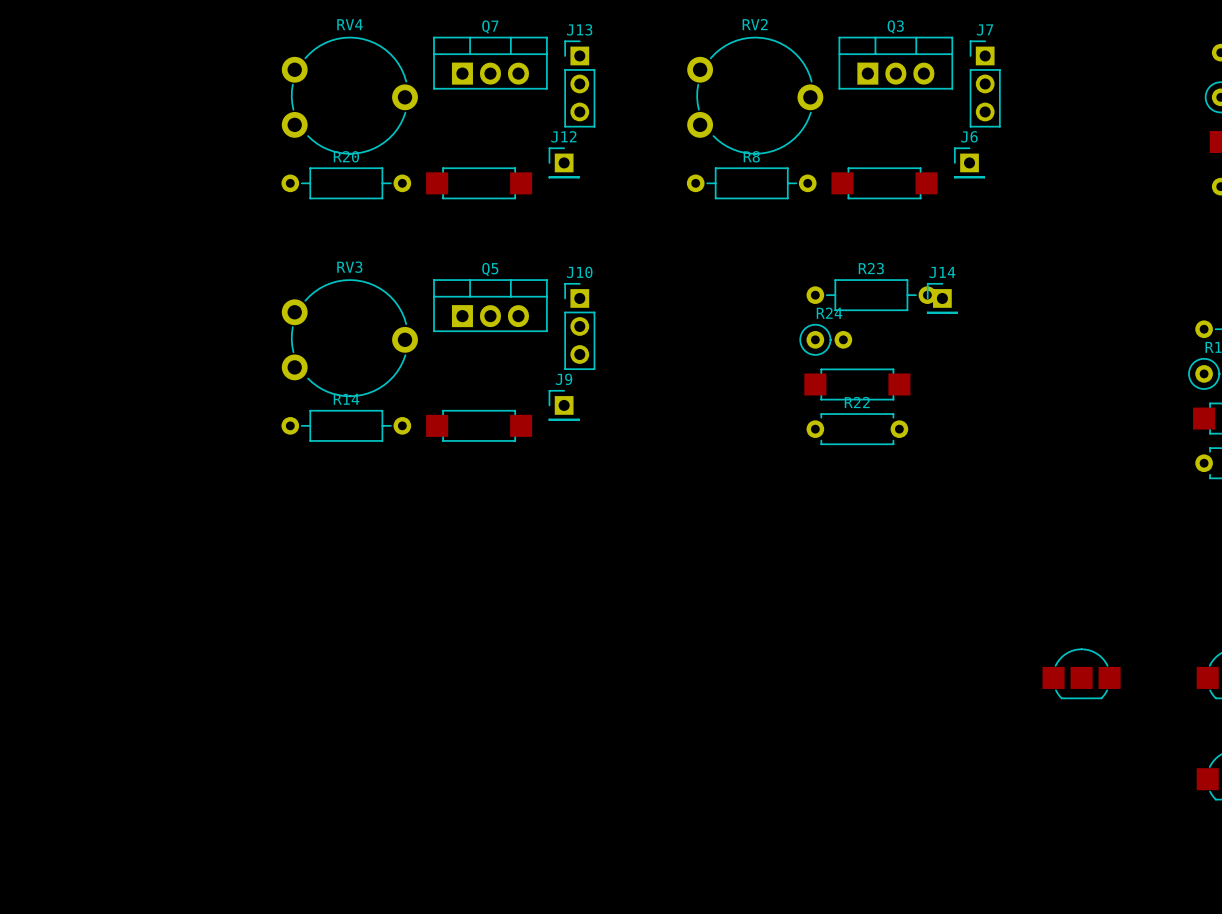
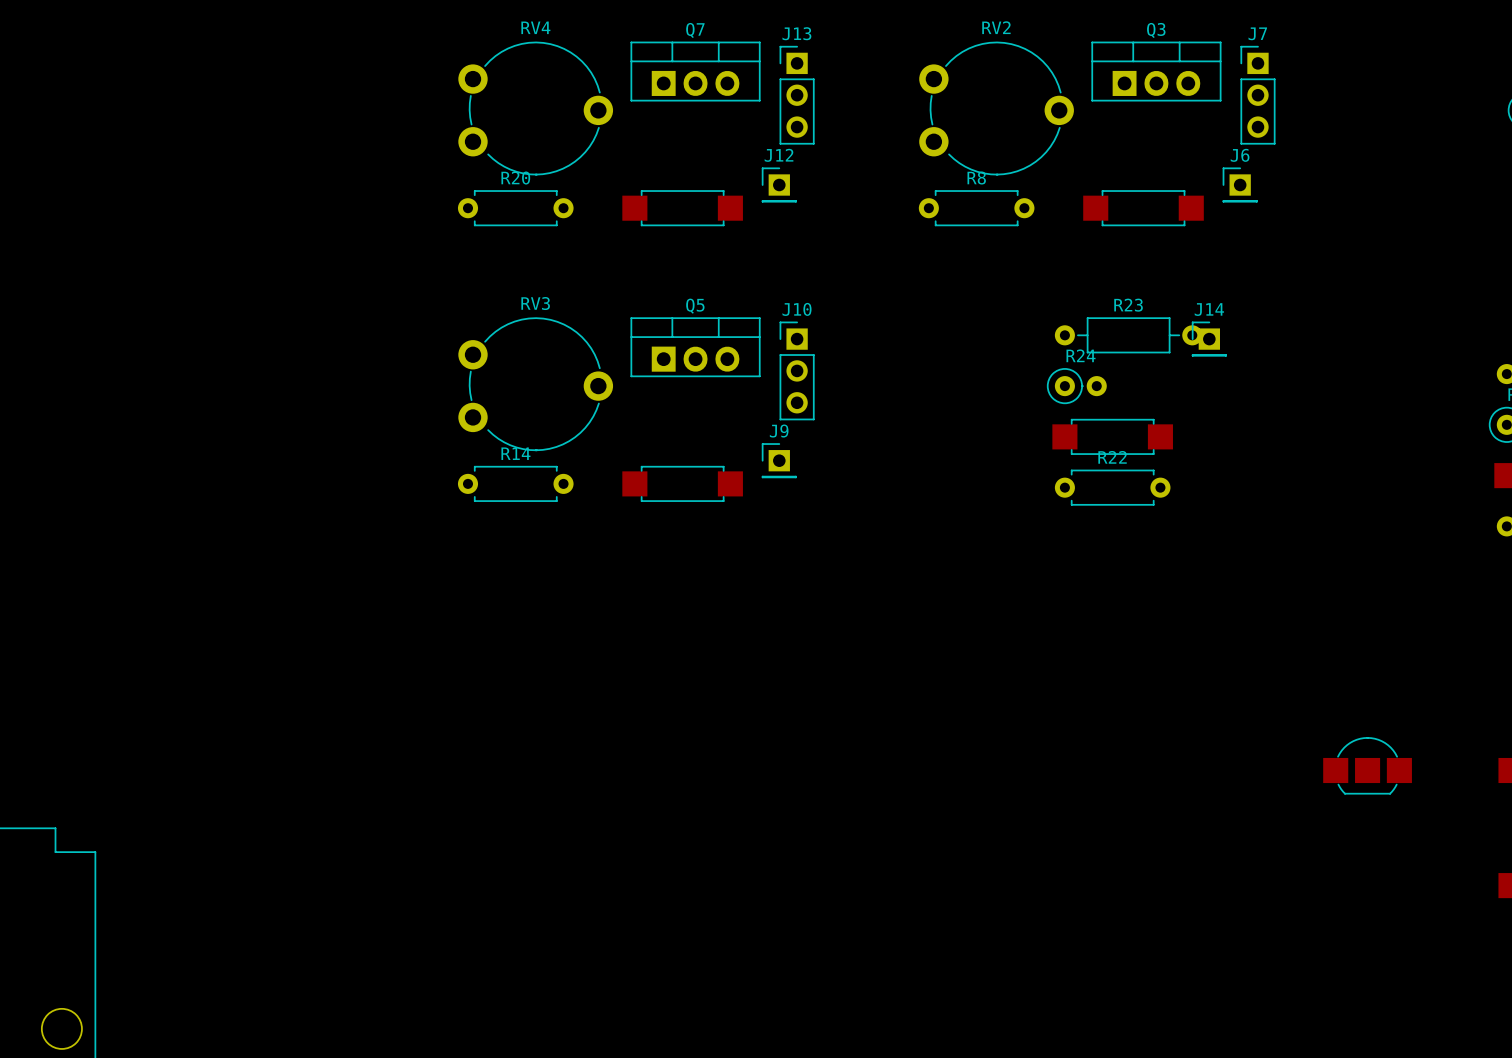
R20 footprint: [281, 167, 412, 200] -> [457, 190, 574, 227]
R8 footprint: [686, 167, 817, 200] -> [918, 190, 1035, 227]
R14 footprint: [281, 410, 412, 442] -> [457, 465, 574, 502]

